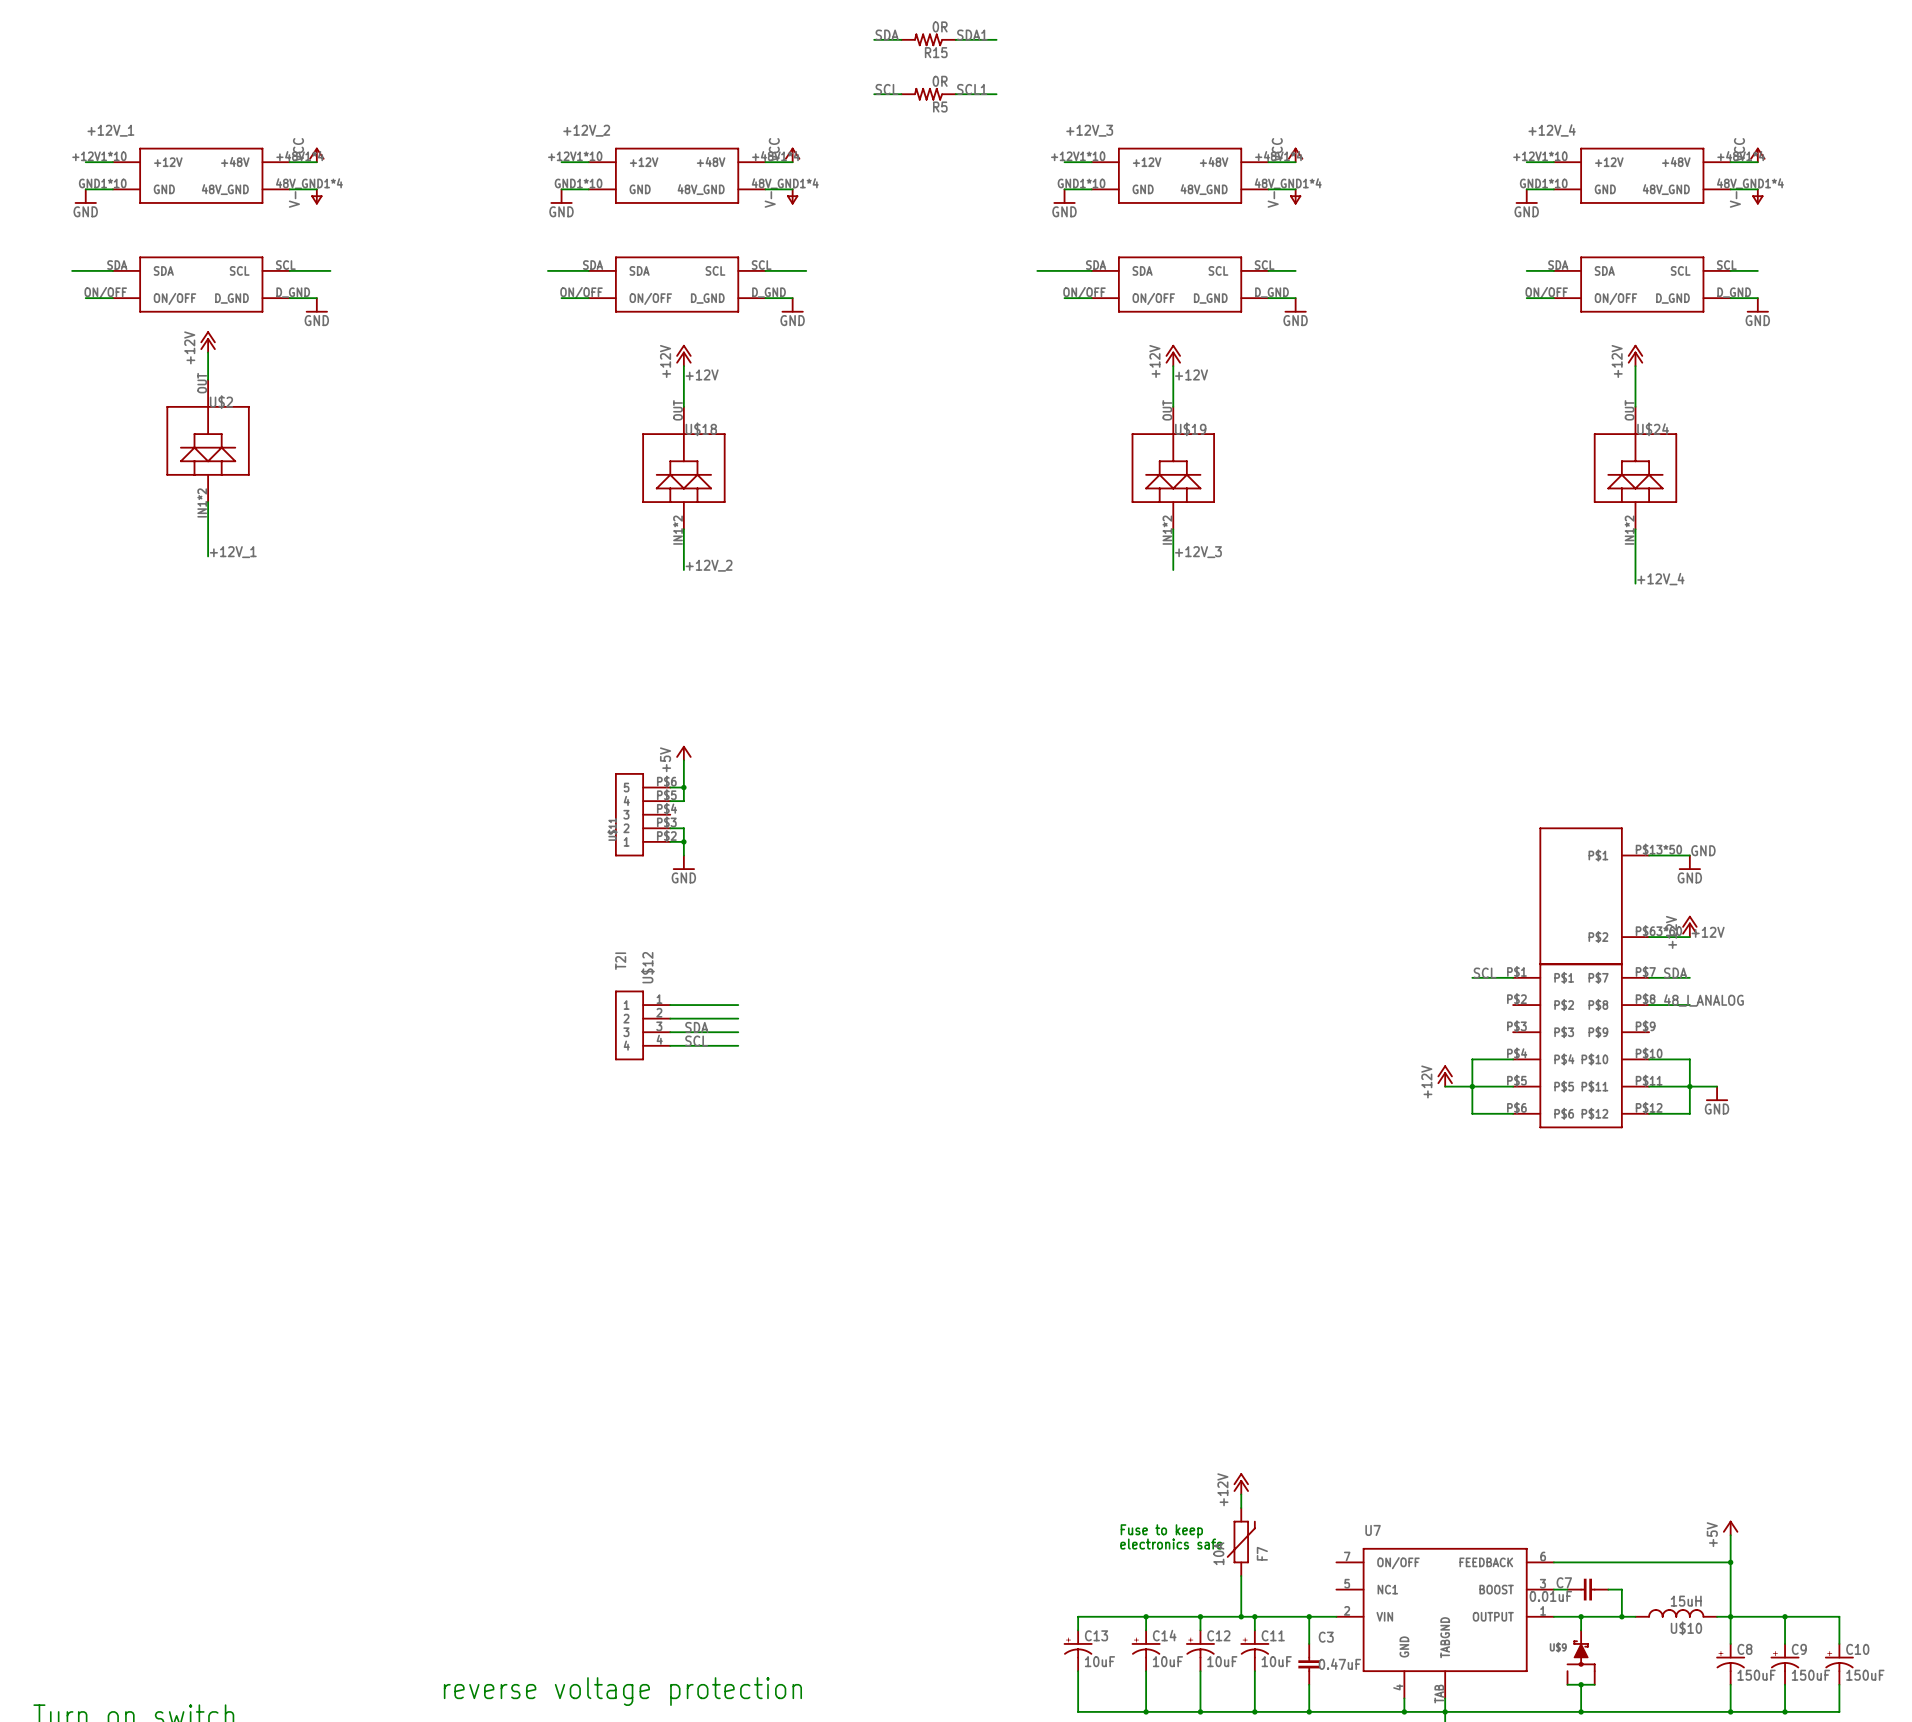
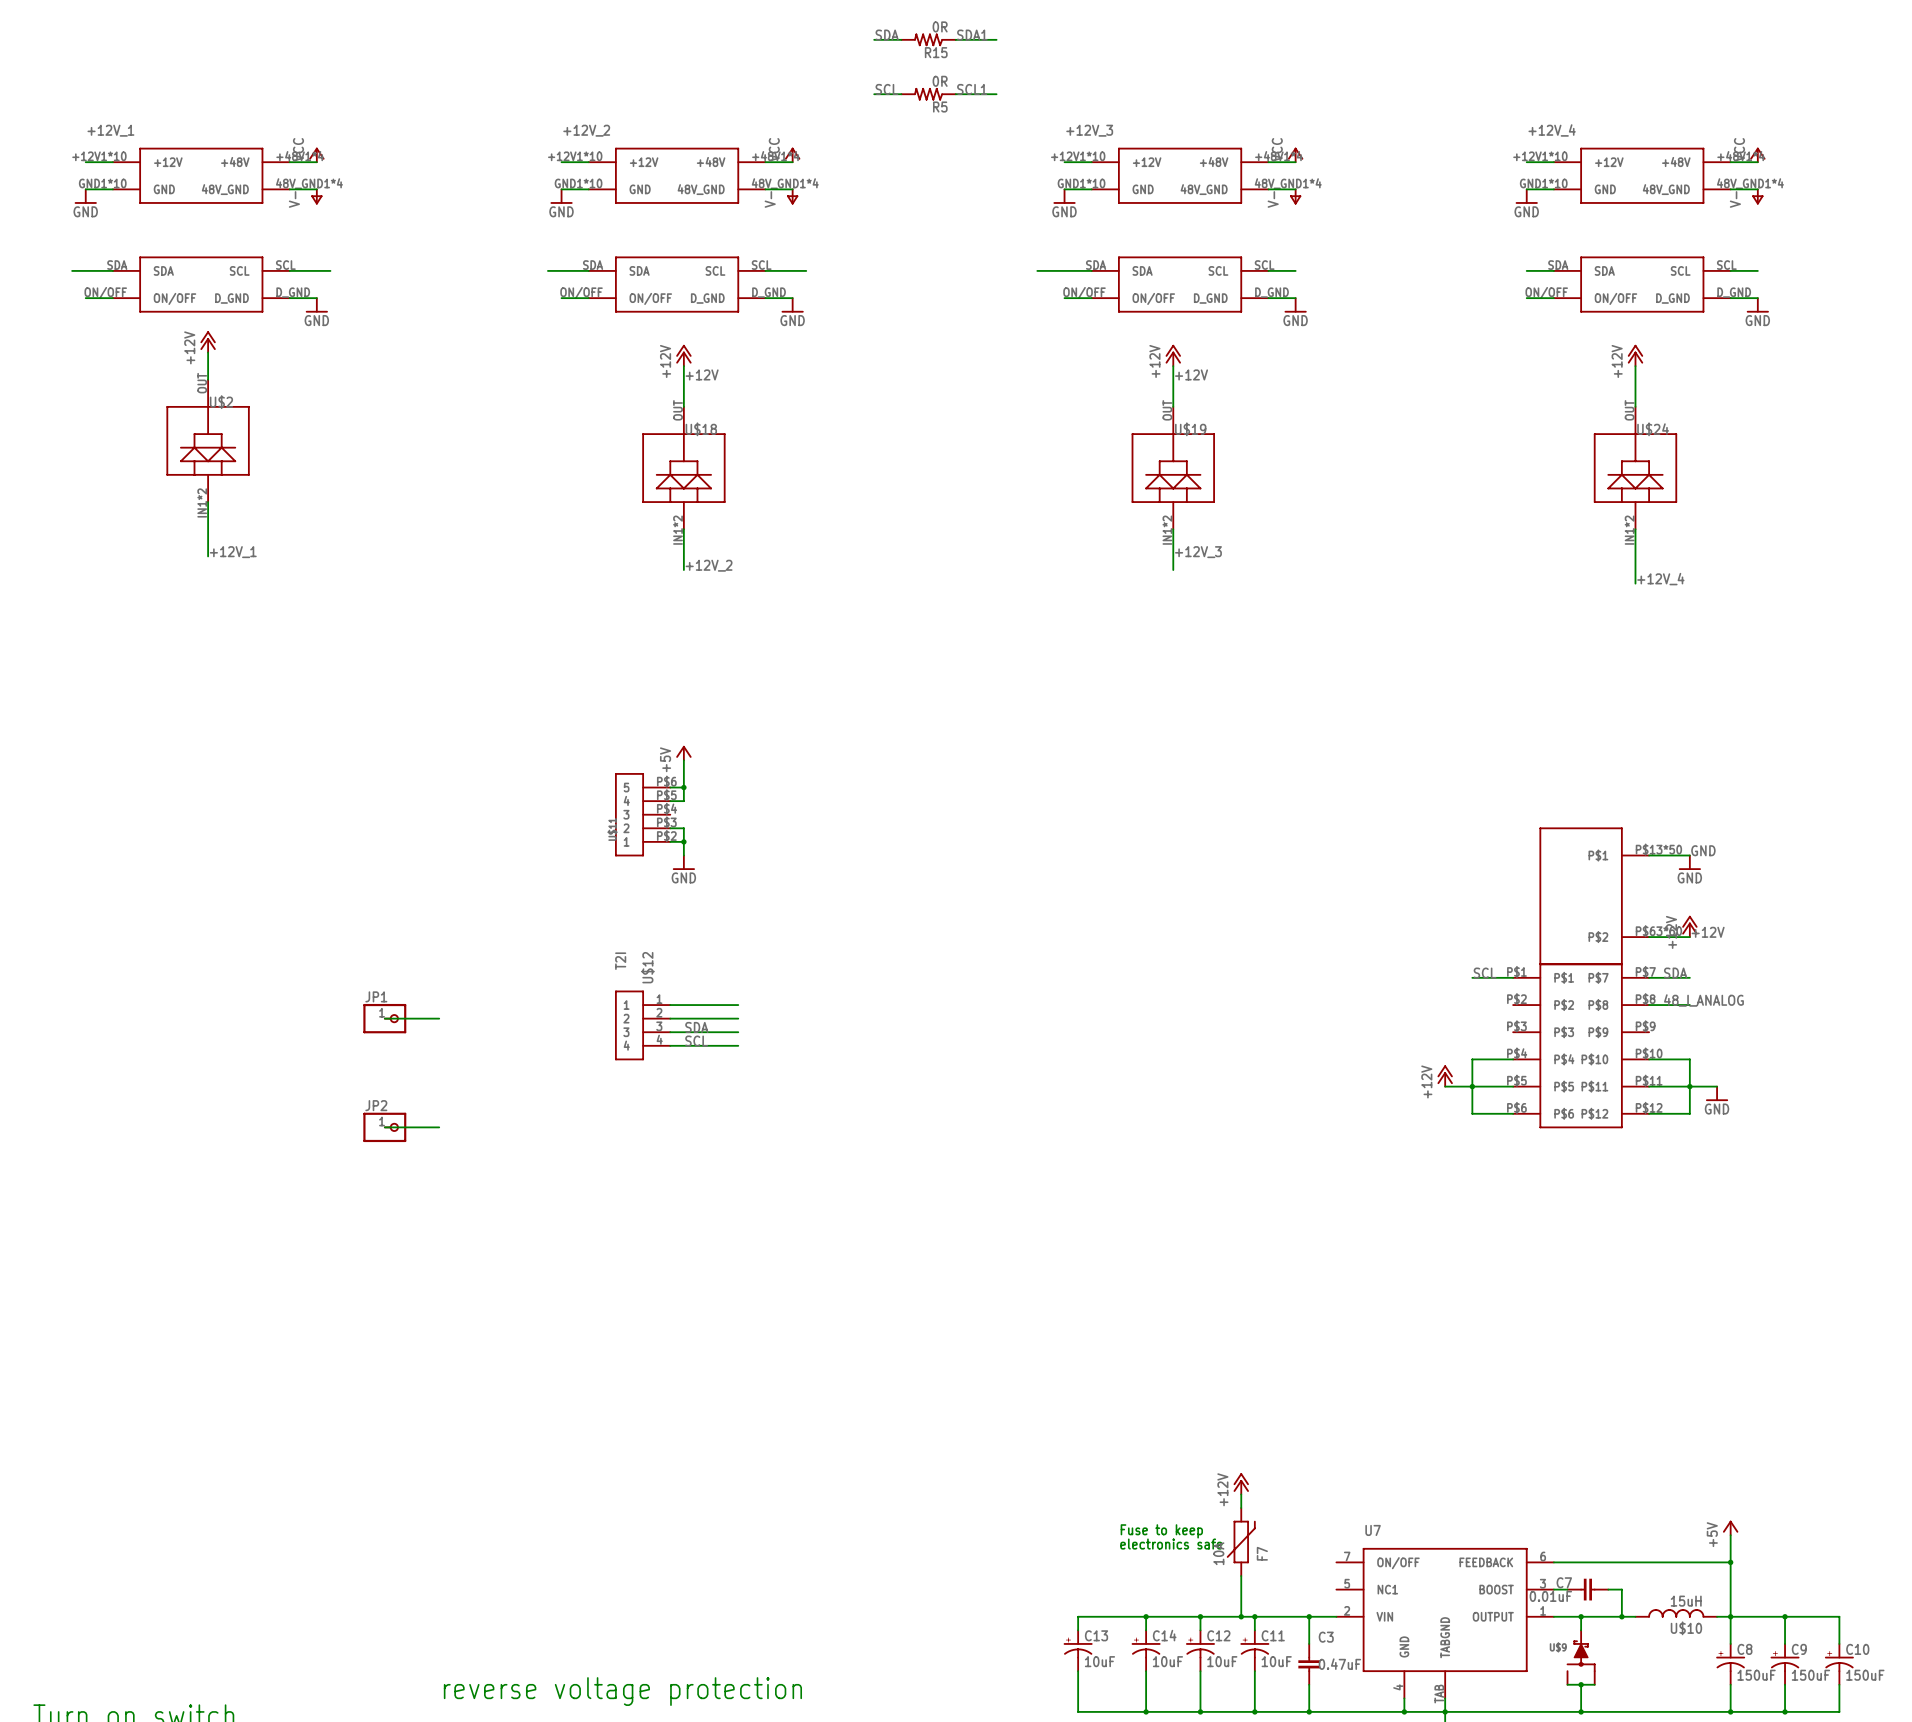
wire: none -> (384, 1018) (439, 1018)
JP1: none -> (384, 1018)
wire: none -> (384, 1127) (439, 1127)
JP2: none -> (384, 1127)

